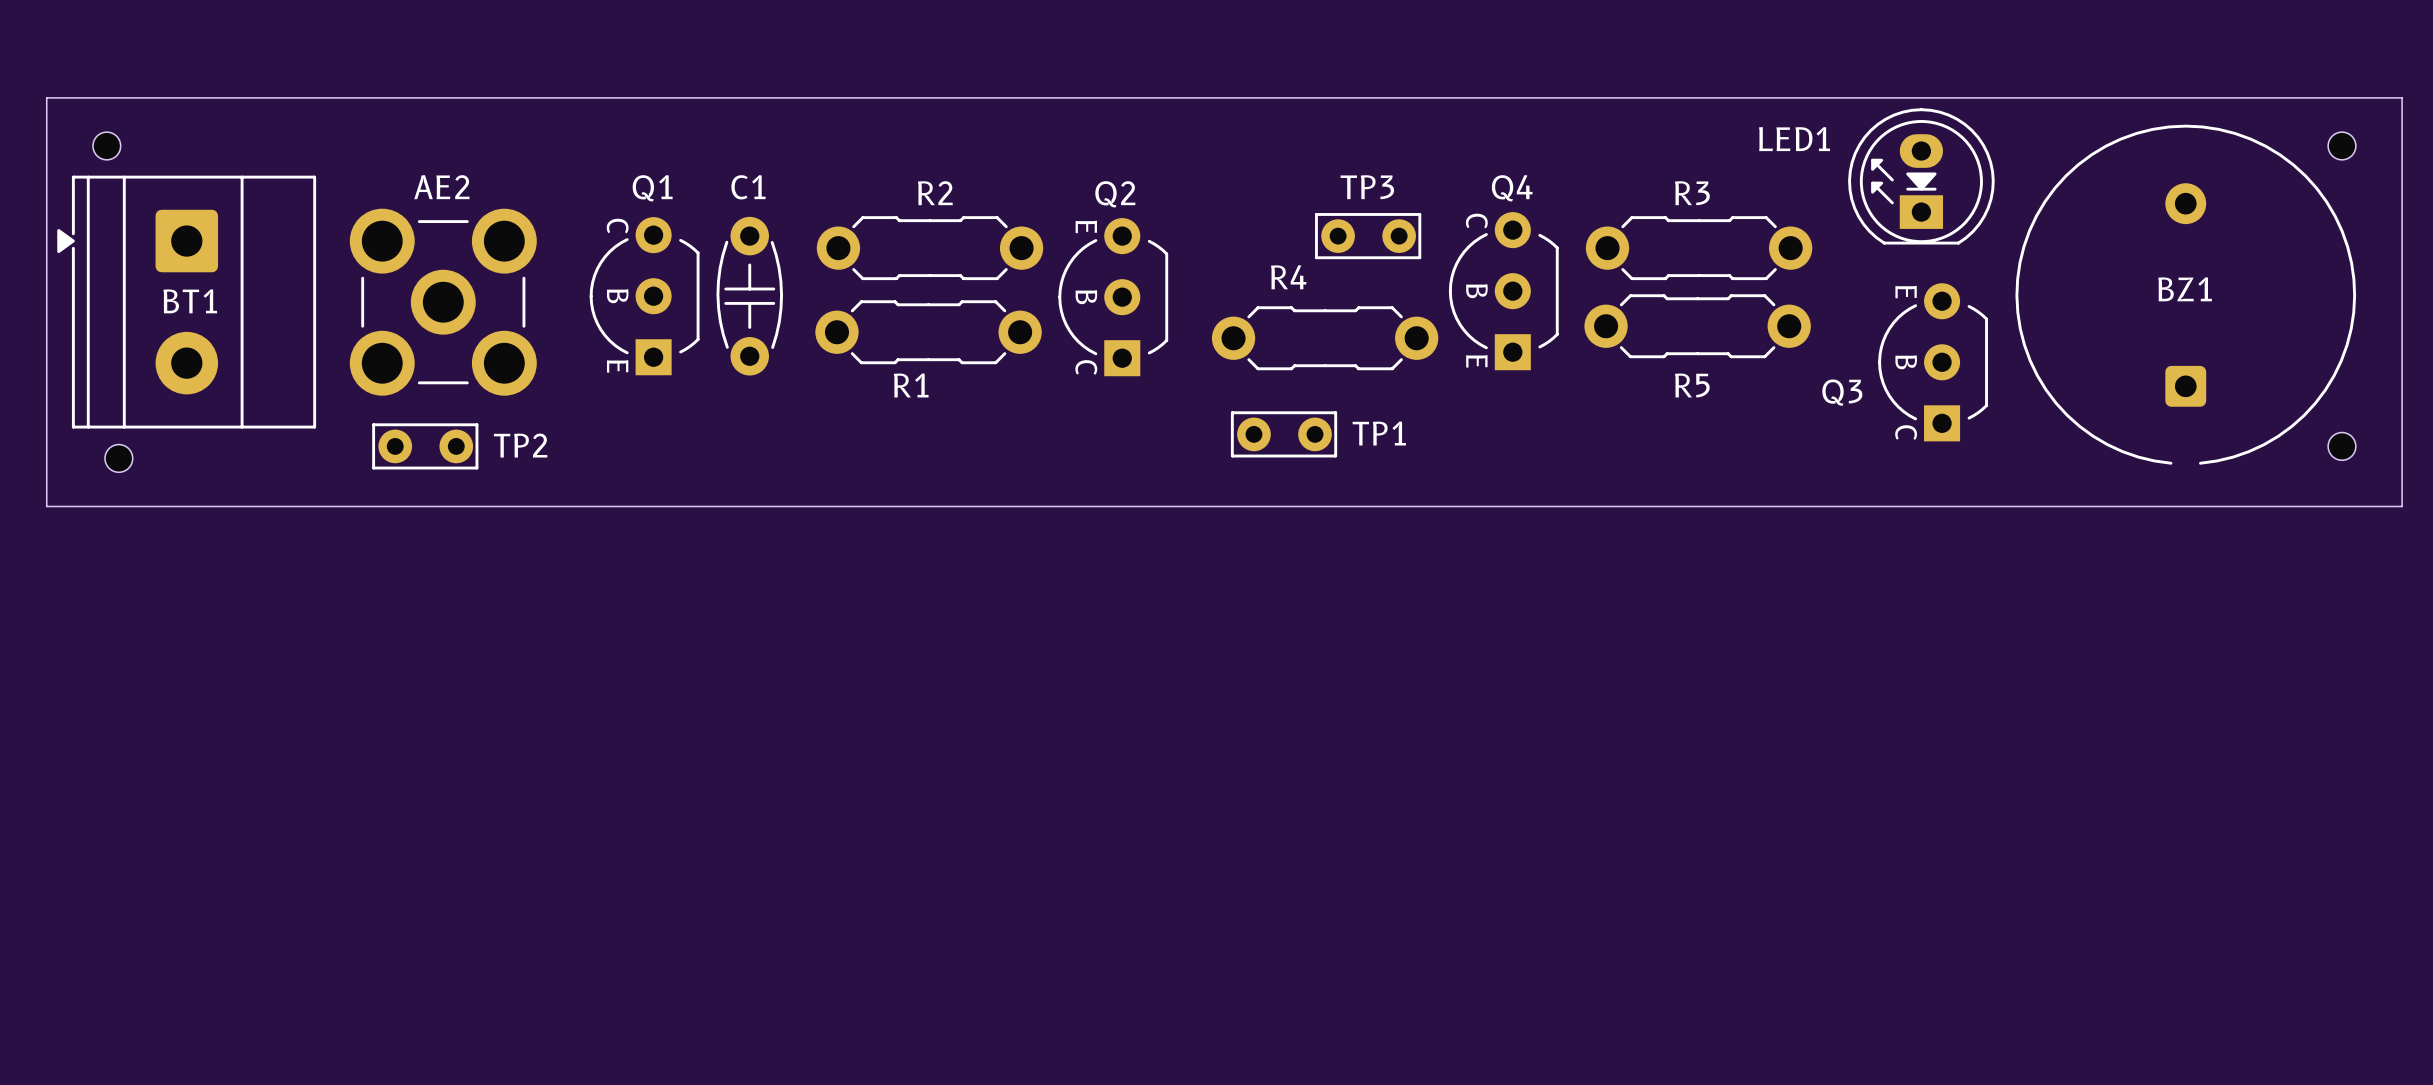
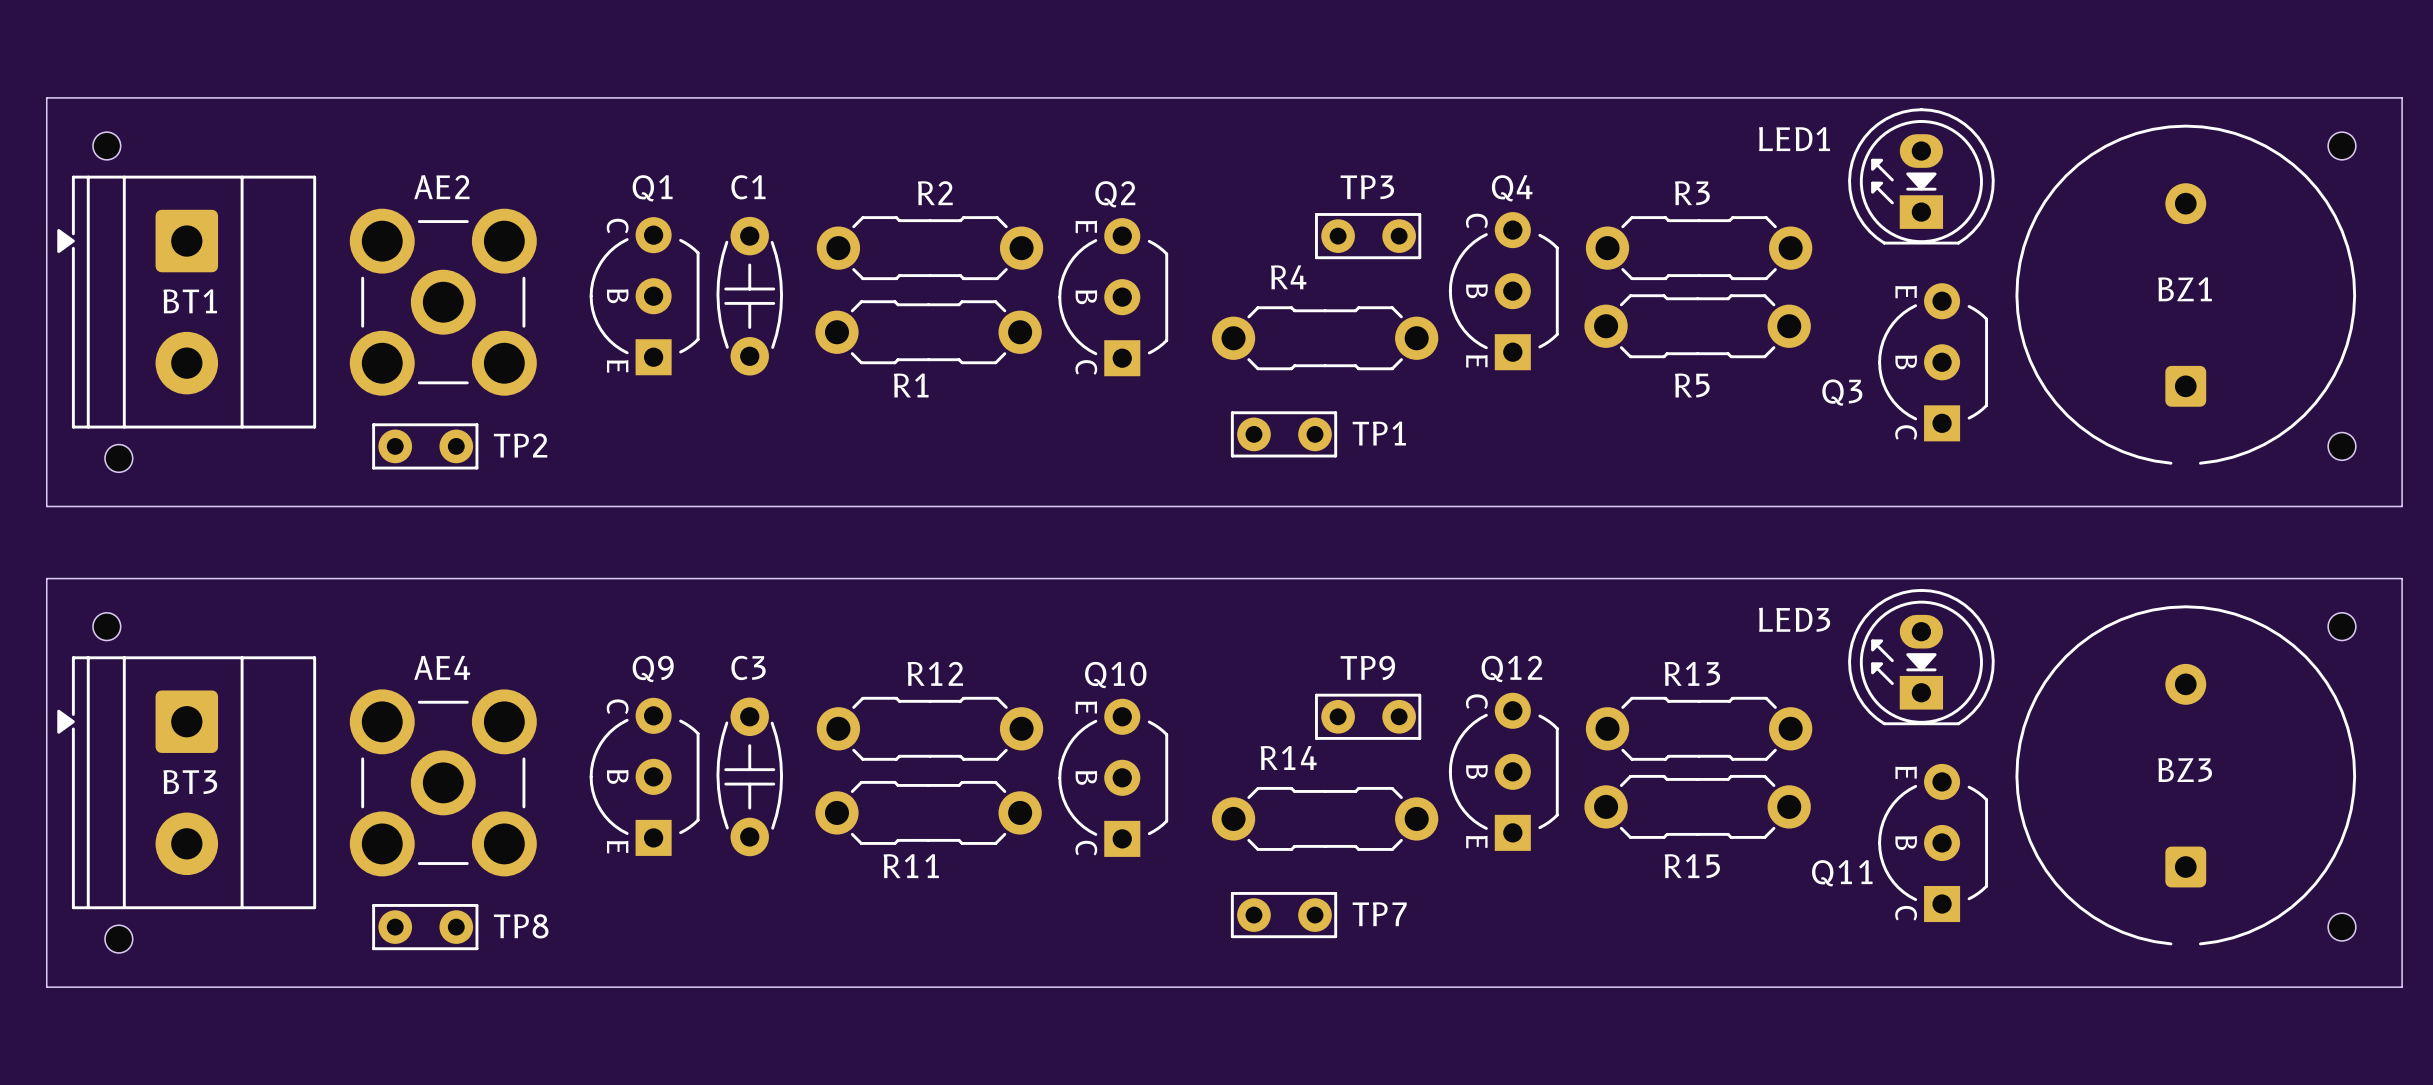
board edge: none -> (46, 578) (2402, 578) (2402, 987) (46, 987) (46, 578)
part: none -> (106, 626)
part: none -> (2341, 626)
LED3: none -> (1921, 657)
TP9: none -> (1368, 716)
R12: none -> (930, 728)
R13: none -> (1699, 728)
Q12: none -> (1503, 771)
BZ3: none -> (2185, 775)
Q9: none -> (644, 776)
C3: none -> (749, 776)
Q10: none -> (1113, 777)
BT3: none -> (186, 782)
AE4: none -> (443, 782)
R15: none -> (1697, 806)
R11: none -> (928, 812)
R14: none -> (1325, 818)
Q11: none -> (1933, 842)
TP7: none -> (1284, 915)
TP8: none -> (425, 927)
part: none -> (2341, 927)
part: none -> (118, 939)

